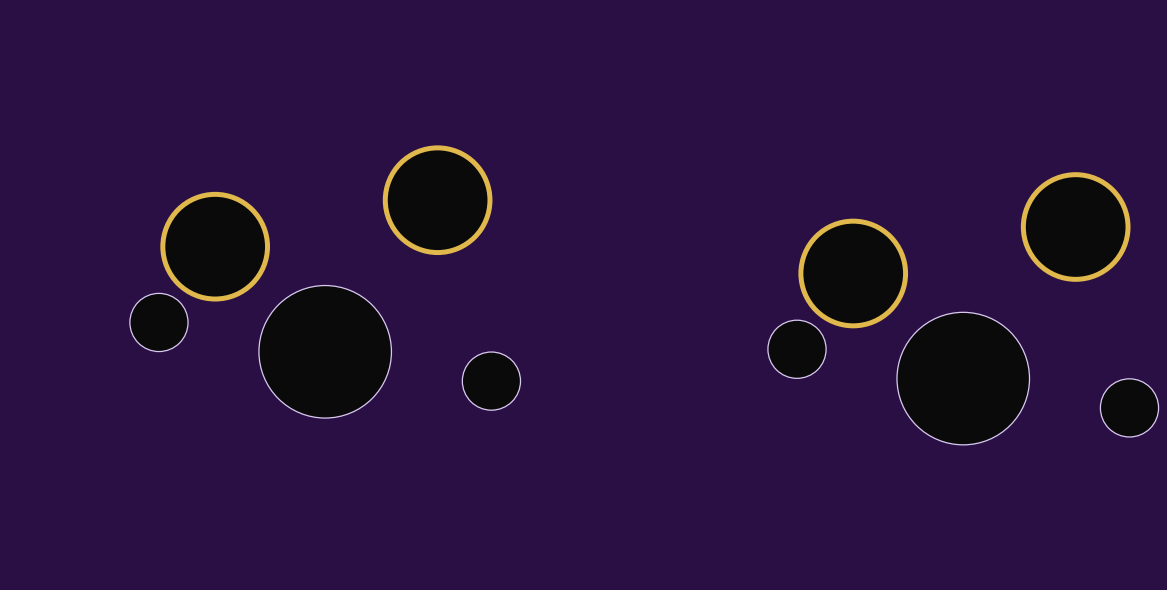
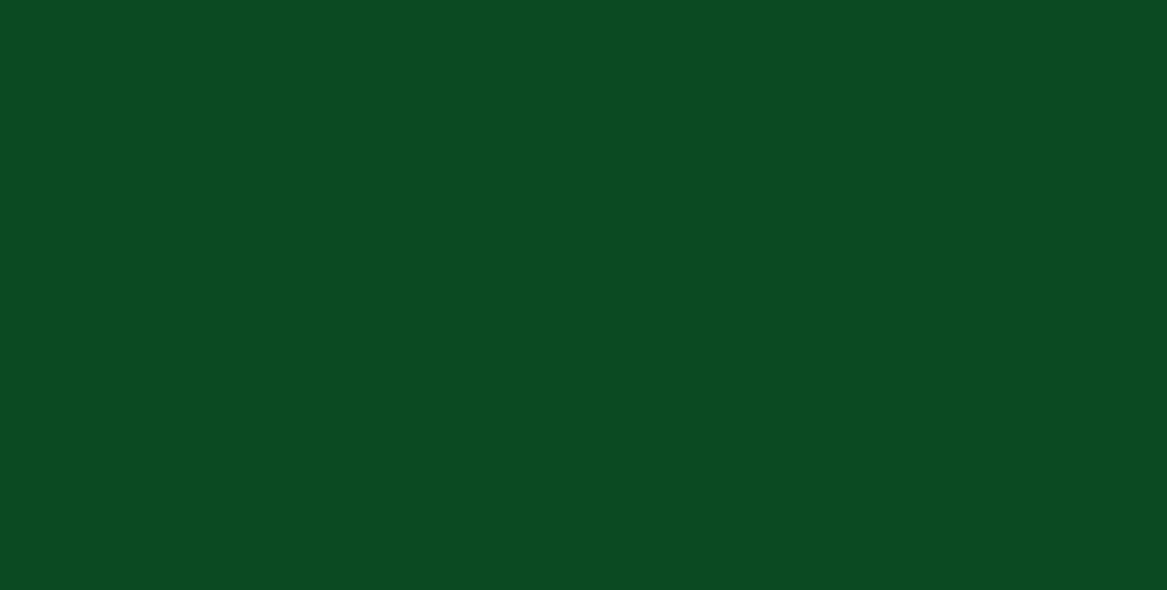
part: (325, 281) -> none
part: (963, 308) -> none

